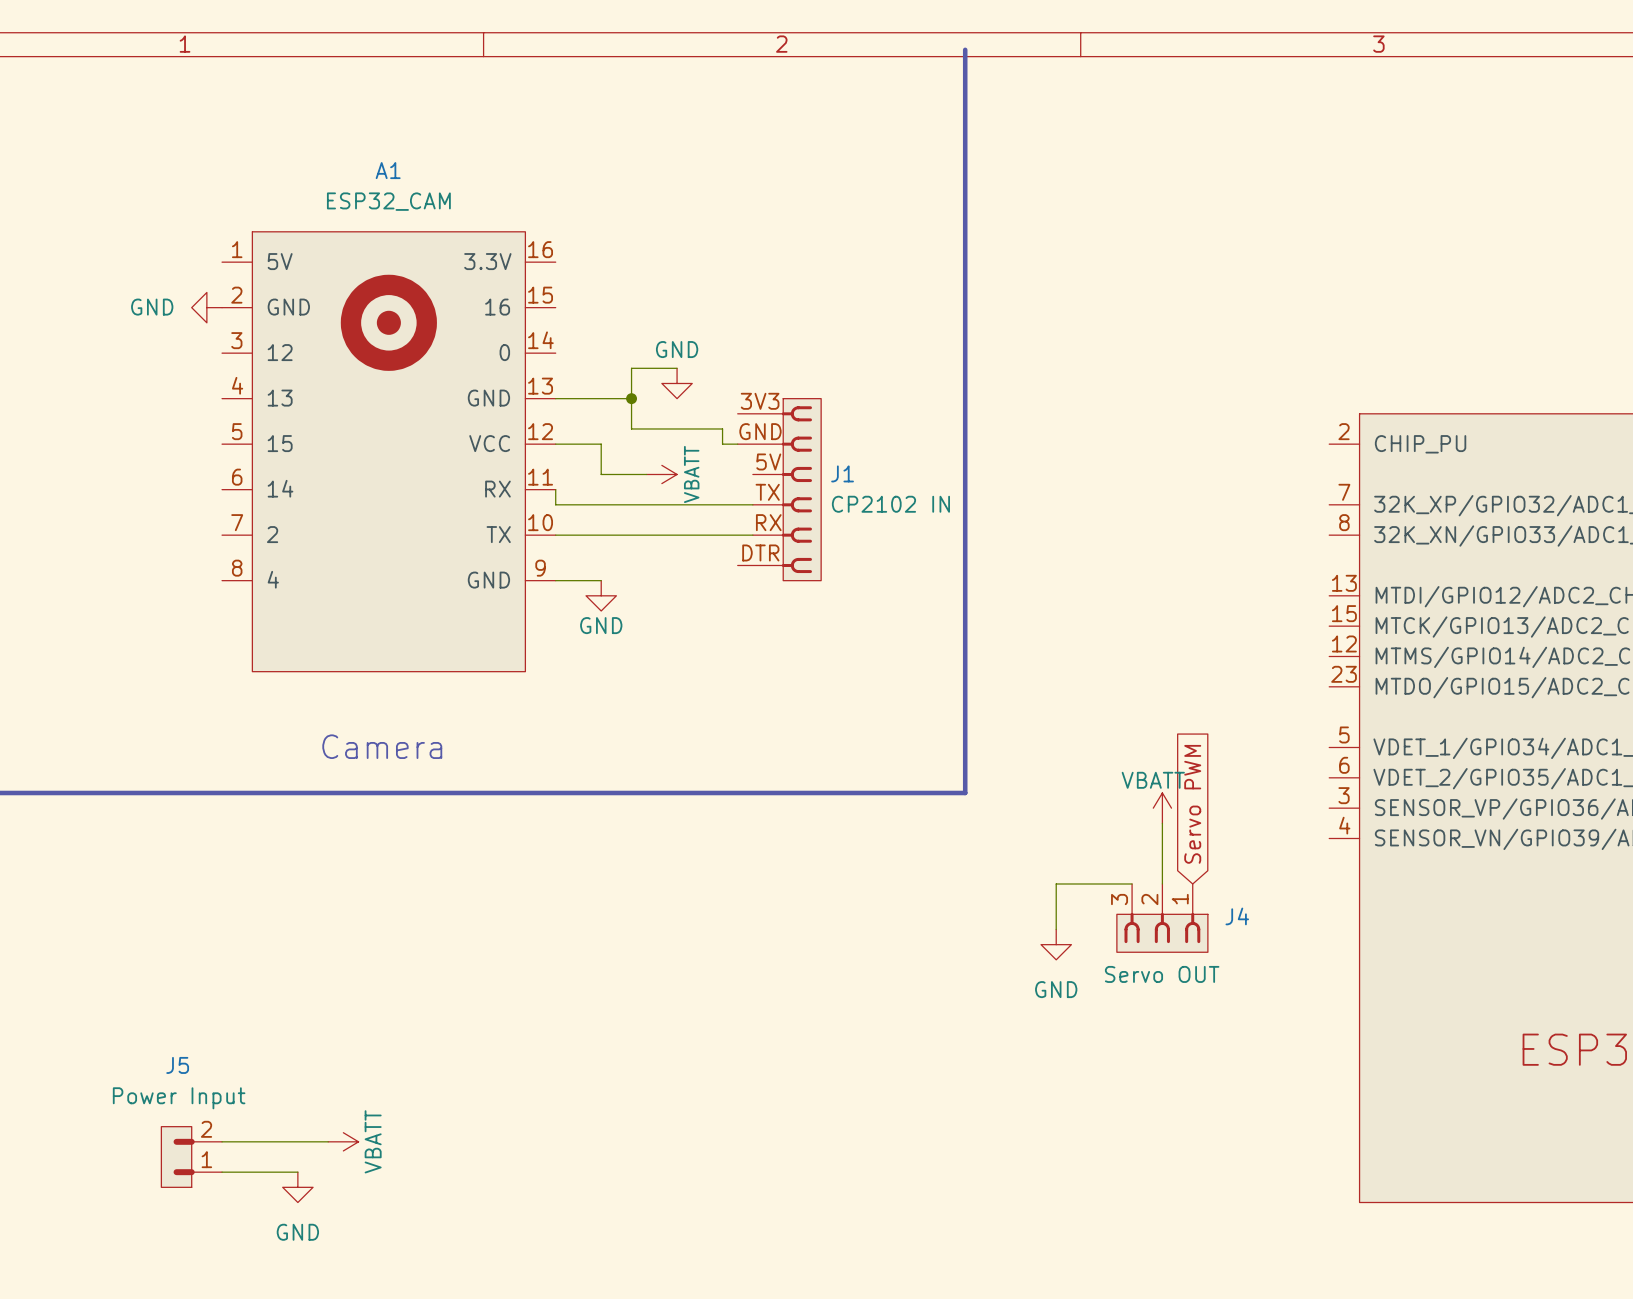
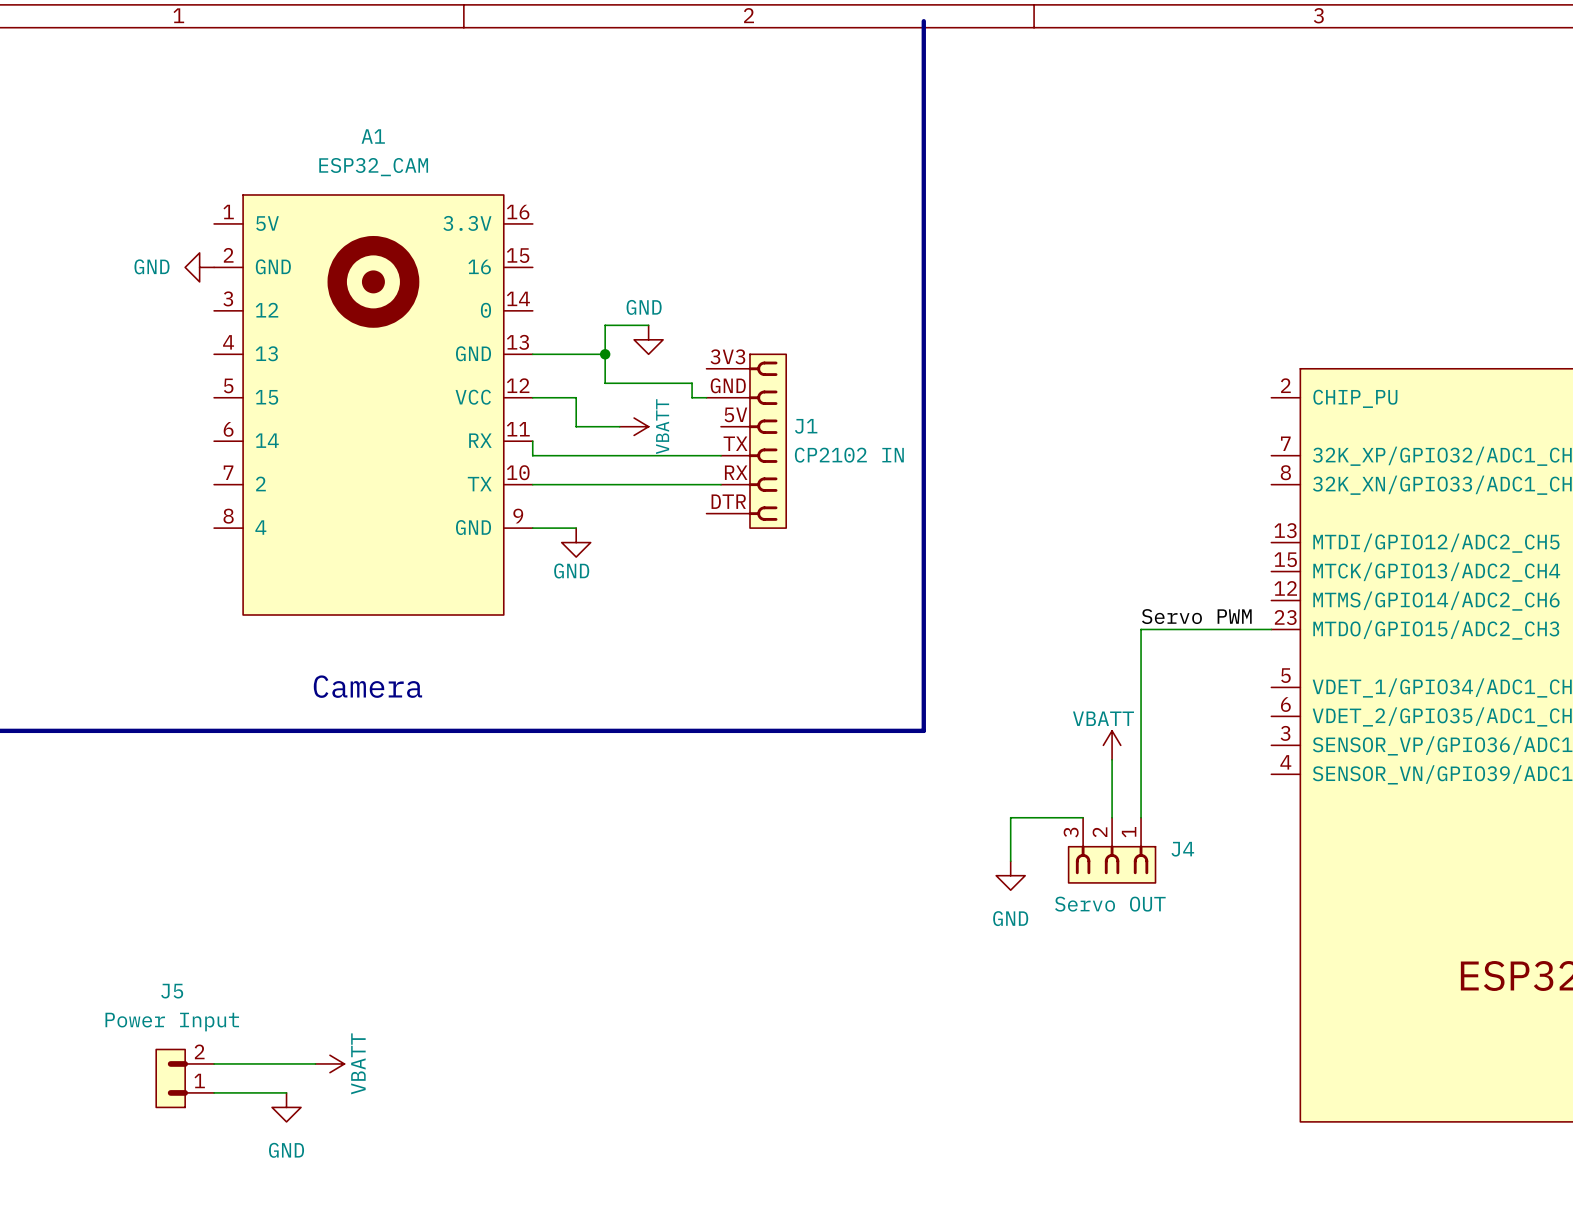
label: none -> Servo PWM (1196, 616)
wire: none -> (1271, 629) (1141, 629) (1141, 817)
global label: Servo PWM (1192, 804) -> none

